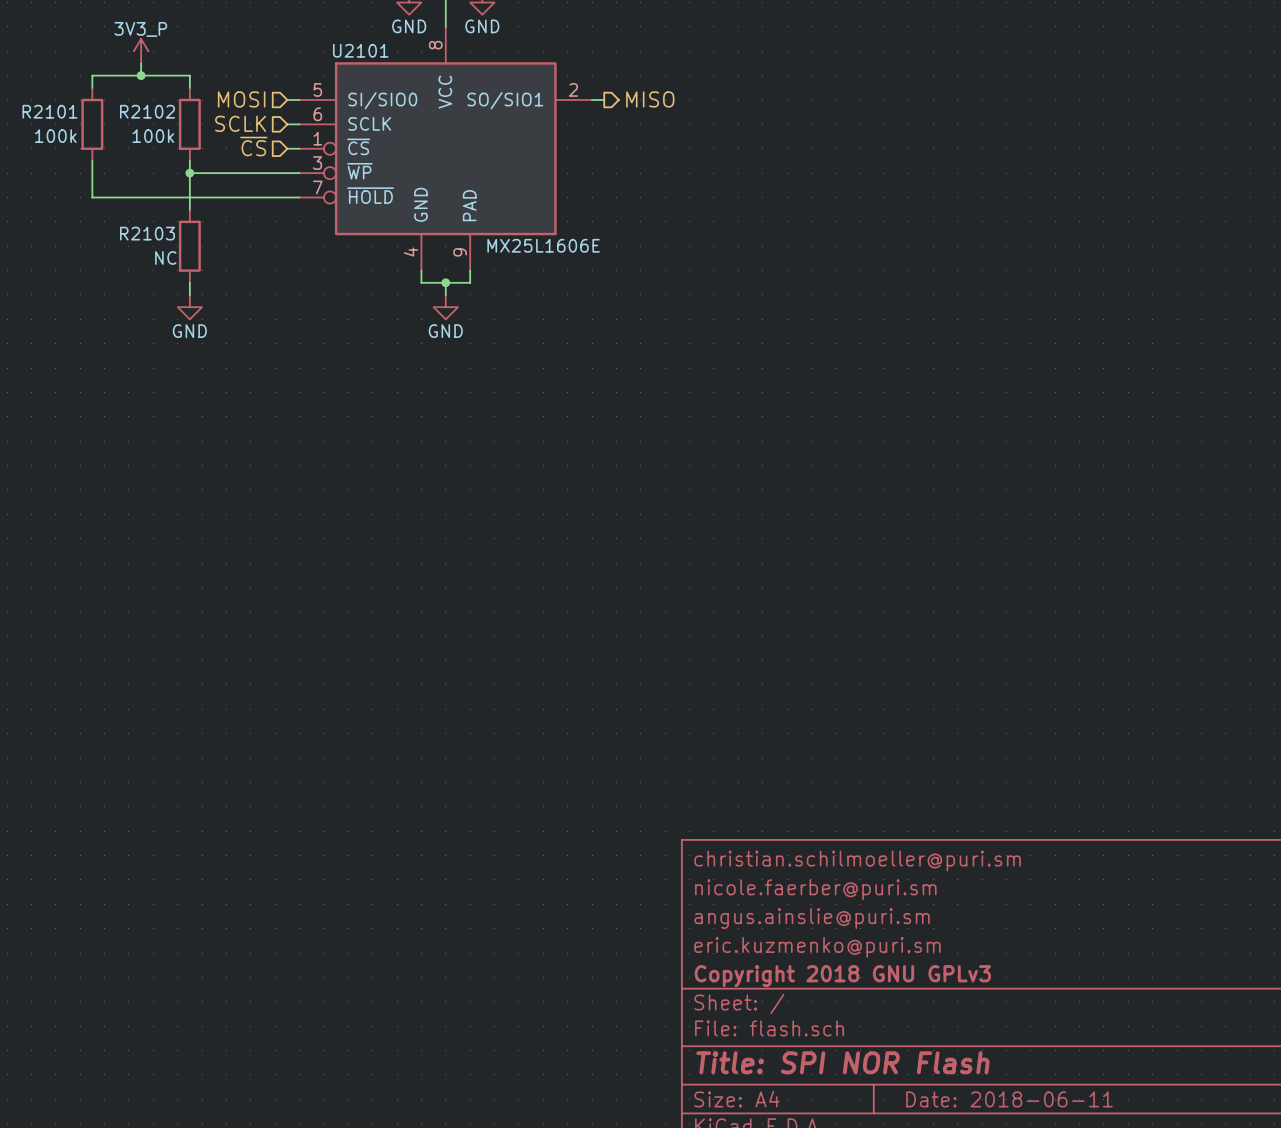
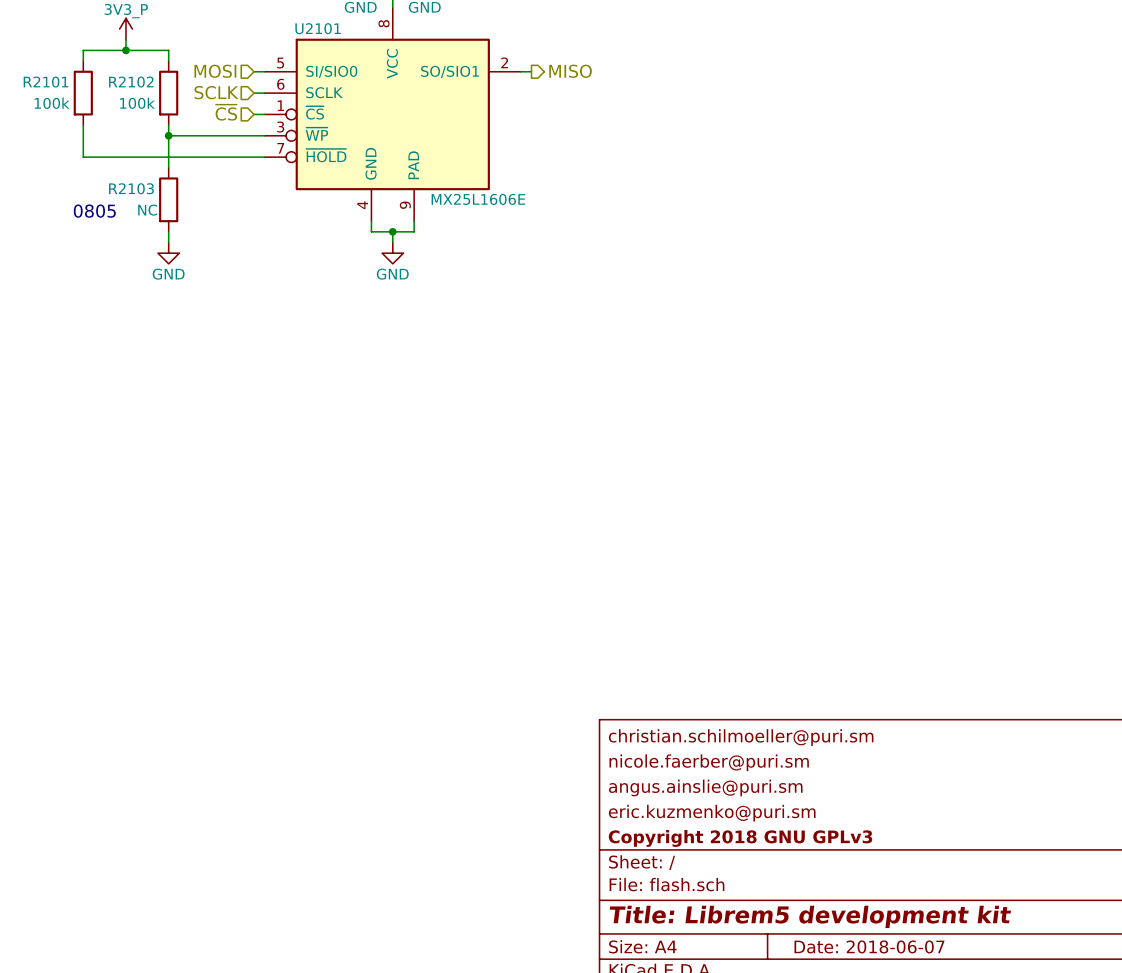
text: none -> 0805 (94, 211)
title block: Title: SPI NOR Flash (842, 1062) -> Title: Librem5 development kit (810, 916)
title block: Date: 2018-06-11 (1009, 1099) -> Date: 2018-06-07 (869, 946)

